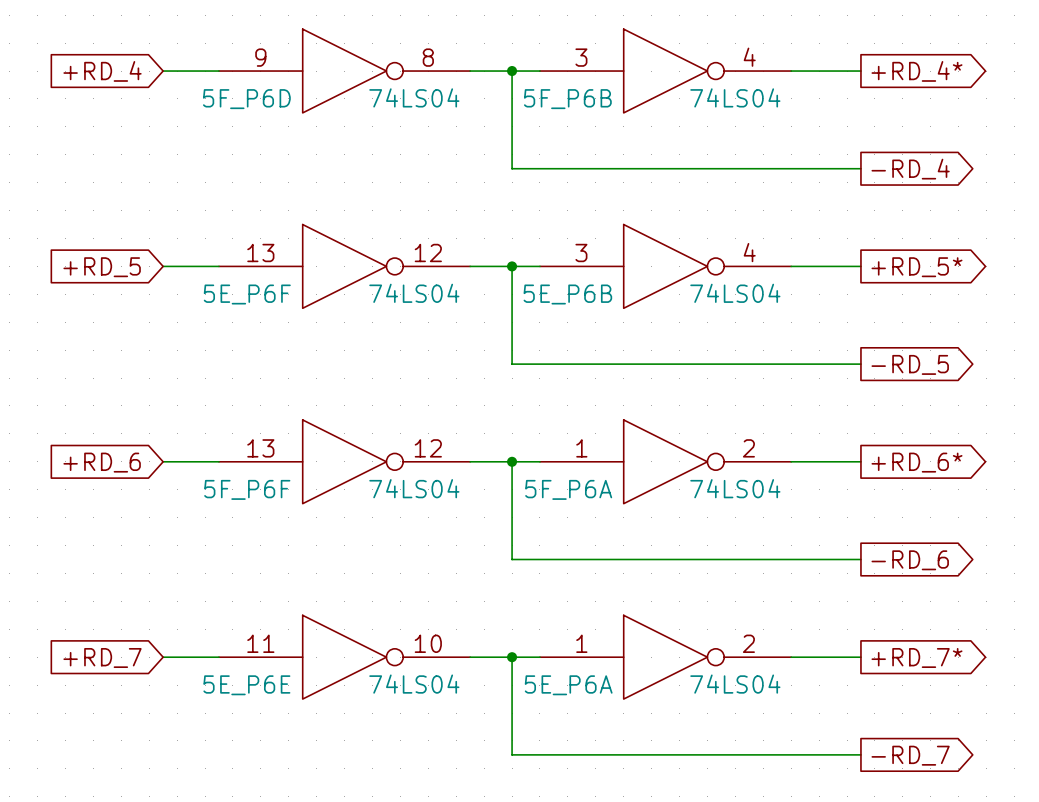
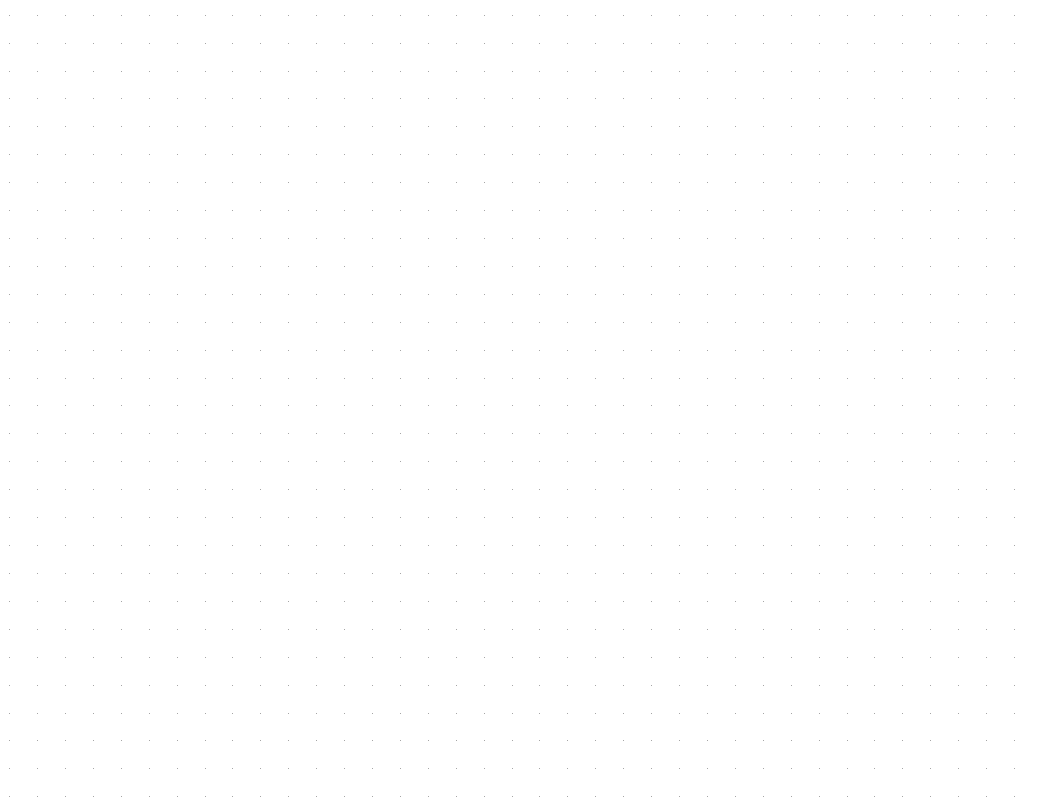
global label: +RD_4 (102, 71) -> none
wire: (163, 71) (218, 71) -> none
5F_P6D: 74LS04 (344, 71) -> none
wire: (470, 71) (539, 71) -> none
wire: (512, 71) (512, 168) (860, 168) -> none
junction: (512, 71) -> none
5F_P6B: 74LS04 (665, 71) -> none
wire: (791, 71) (860, 71) -> none
global label: +RD_4* (916, 71) -> none
global label: -RD_4 (910, 169) -> none
wire: (163, 266) (218, 266) -> none
5E_P6F: 74LS04 (344, 266) -> none
wire: (470, 266) (539, 266) -> none
wire: (512, 266) (512, 364) (860, 364) -> none
junction: (512, 266) -> none
5E_P6B: 74LS04 (665, 266) -> none
wire: (791, 266) (860, 266) -> none
global label: +RD_5 (102, 267) -> none
global label: +RD_5* (916, 267) -> none
global label: -RD_5 (910, 364) -> none
wire: (163, 461) (218, 461) -> none
5F_P6F: 74LS04 (344, 461) -> none
wire: (470, 461) (539, 461) -> none
wire: (512, 461) (512, 559) (860, 559) -> none
junction: (512, 461) -> none
5F_P6A: 74LS04 (665, 461) -> none
wire: (791, 461) (860, 461) -> none
global label: +RD_6 (102, 462) -> none
global label: +RD_6* (916, 462) -> none
global label: -RD_6 (910, 560) -> none
global label: +RD_7 (102, 657) -> none
wire: (163, 657) (218, 657) -> none
5E_P6E: 74LS04 (344, 657) -> none
wire: (470, 657) (539, 657) -> none
wire: (512, 657) (512, 754) (860, 754) -> none
junction: (512, 657) -> none
5E_P6A: 74LS04 (665, 657) -> none
wire: (791, 657) (860, 657) -> none
global label: +RD_7* (916, 657) -> none
global label: -RD_7 (910, 755) -> none

